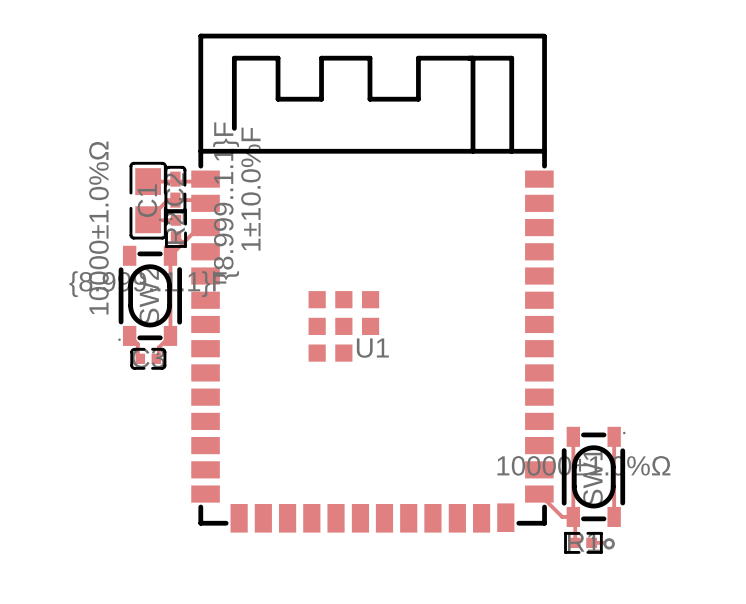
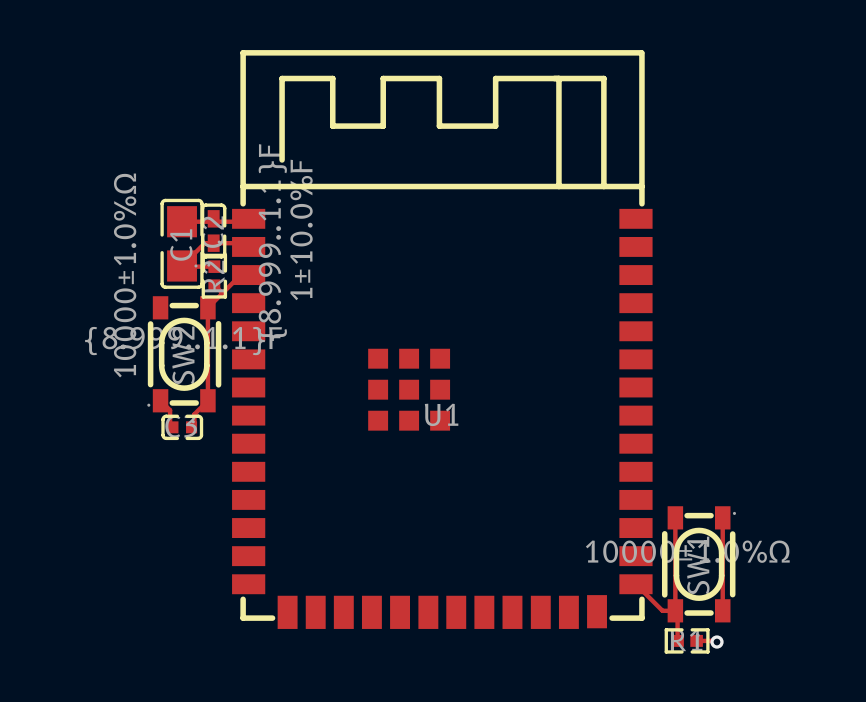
U1 footprint: [191, 33, 554, 533] -> [232, 50, 653, 629]

